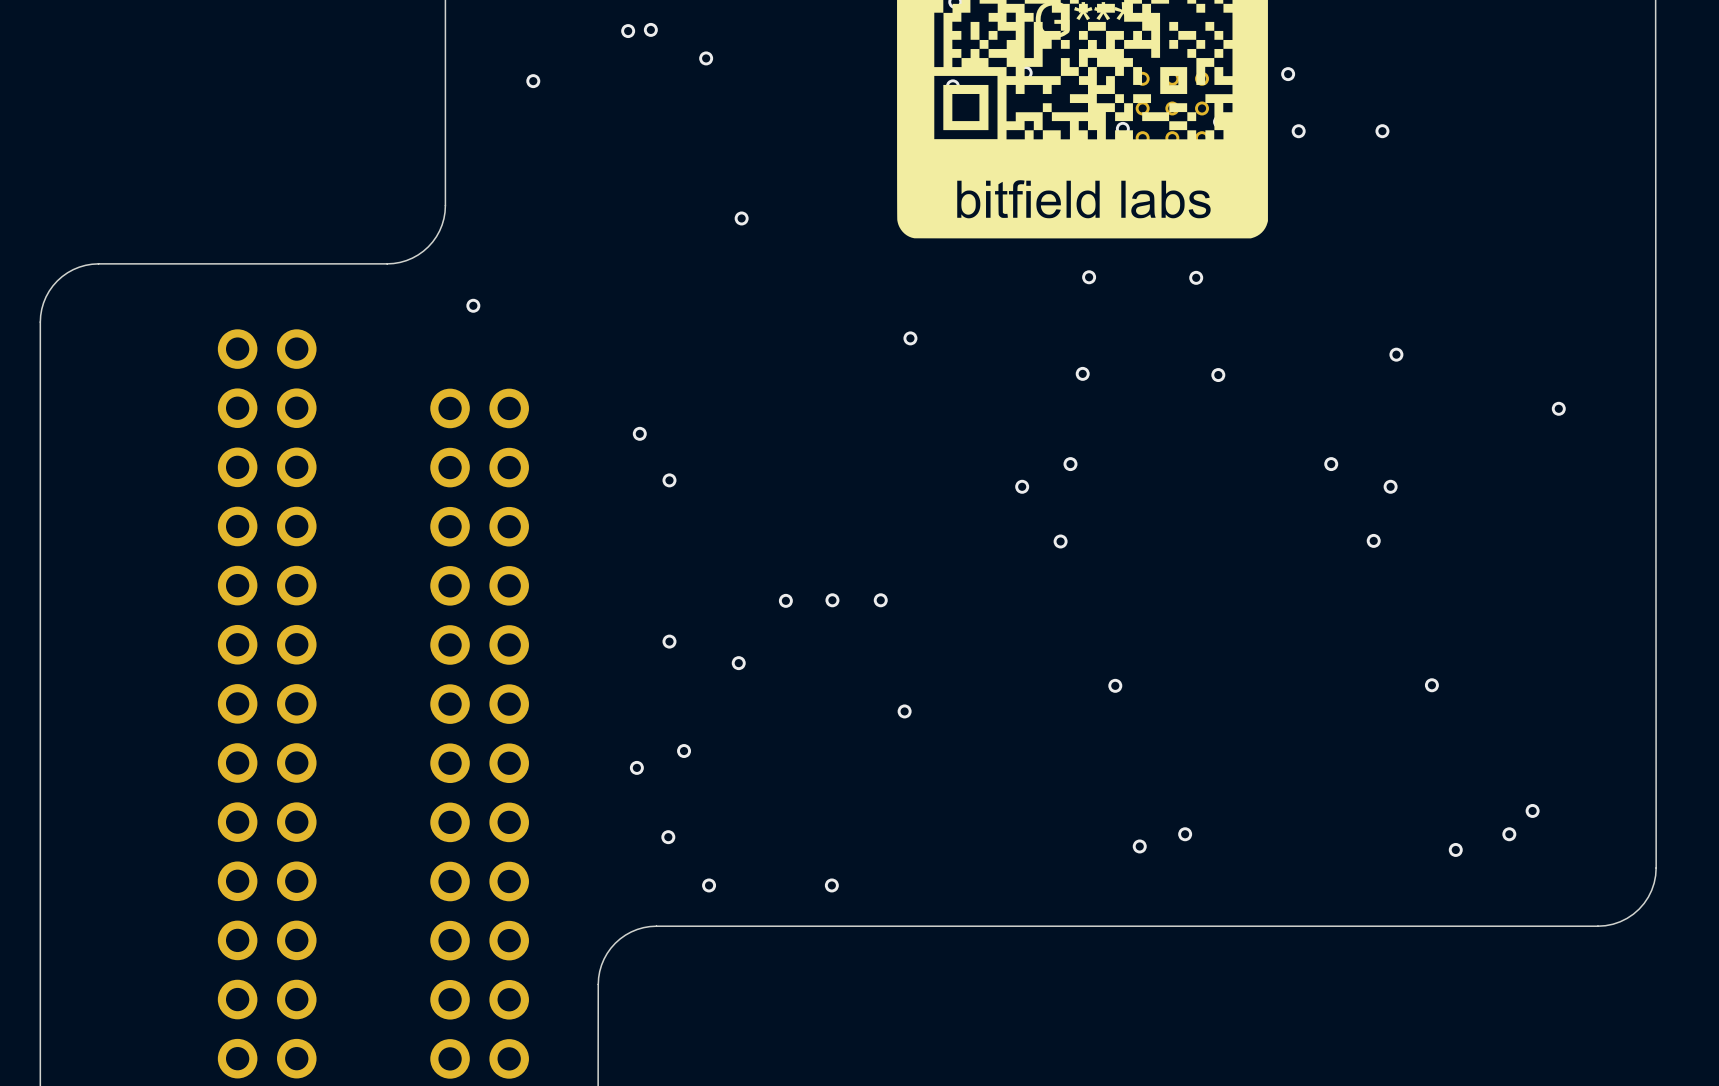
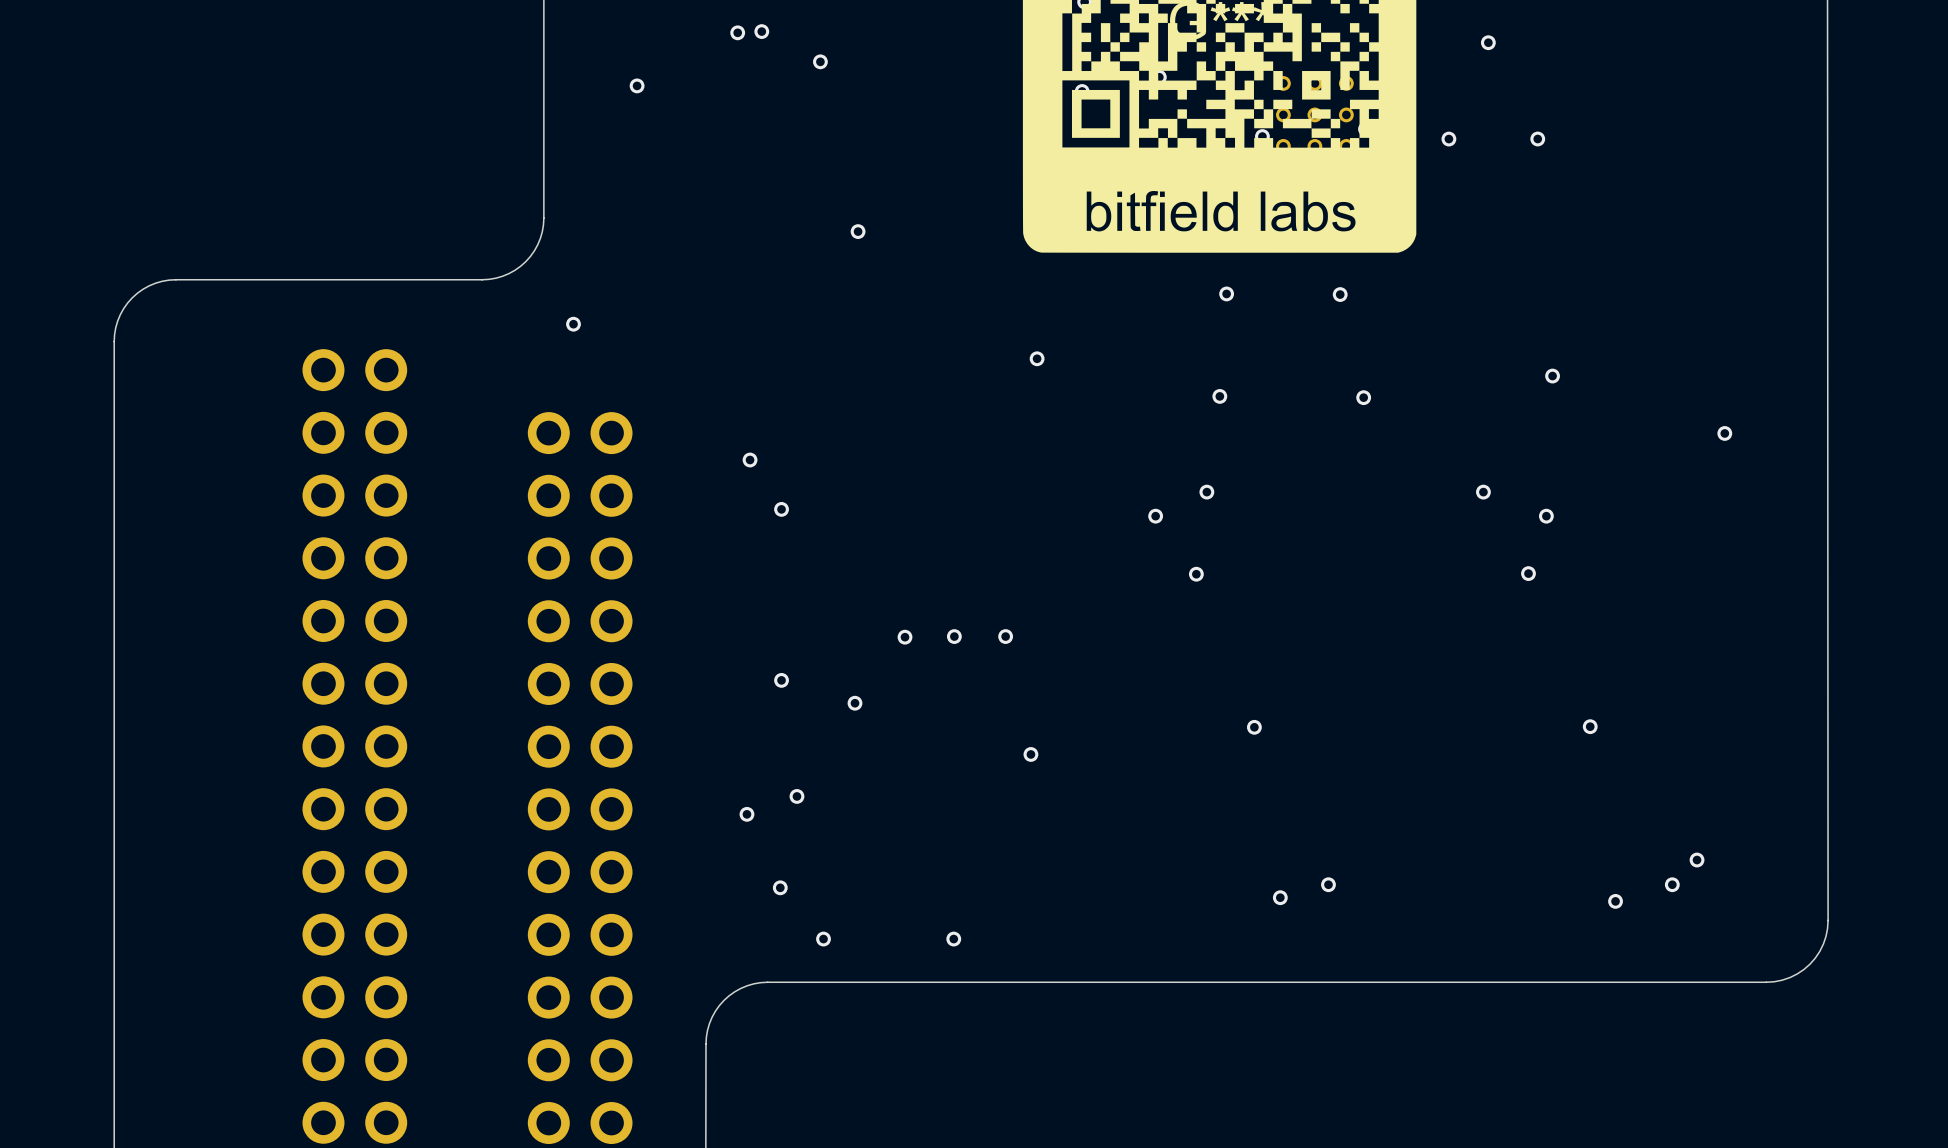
via position: (1288, 74) -> (1488, 42)

